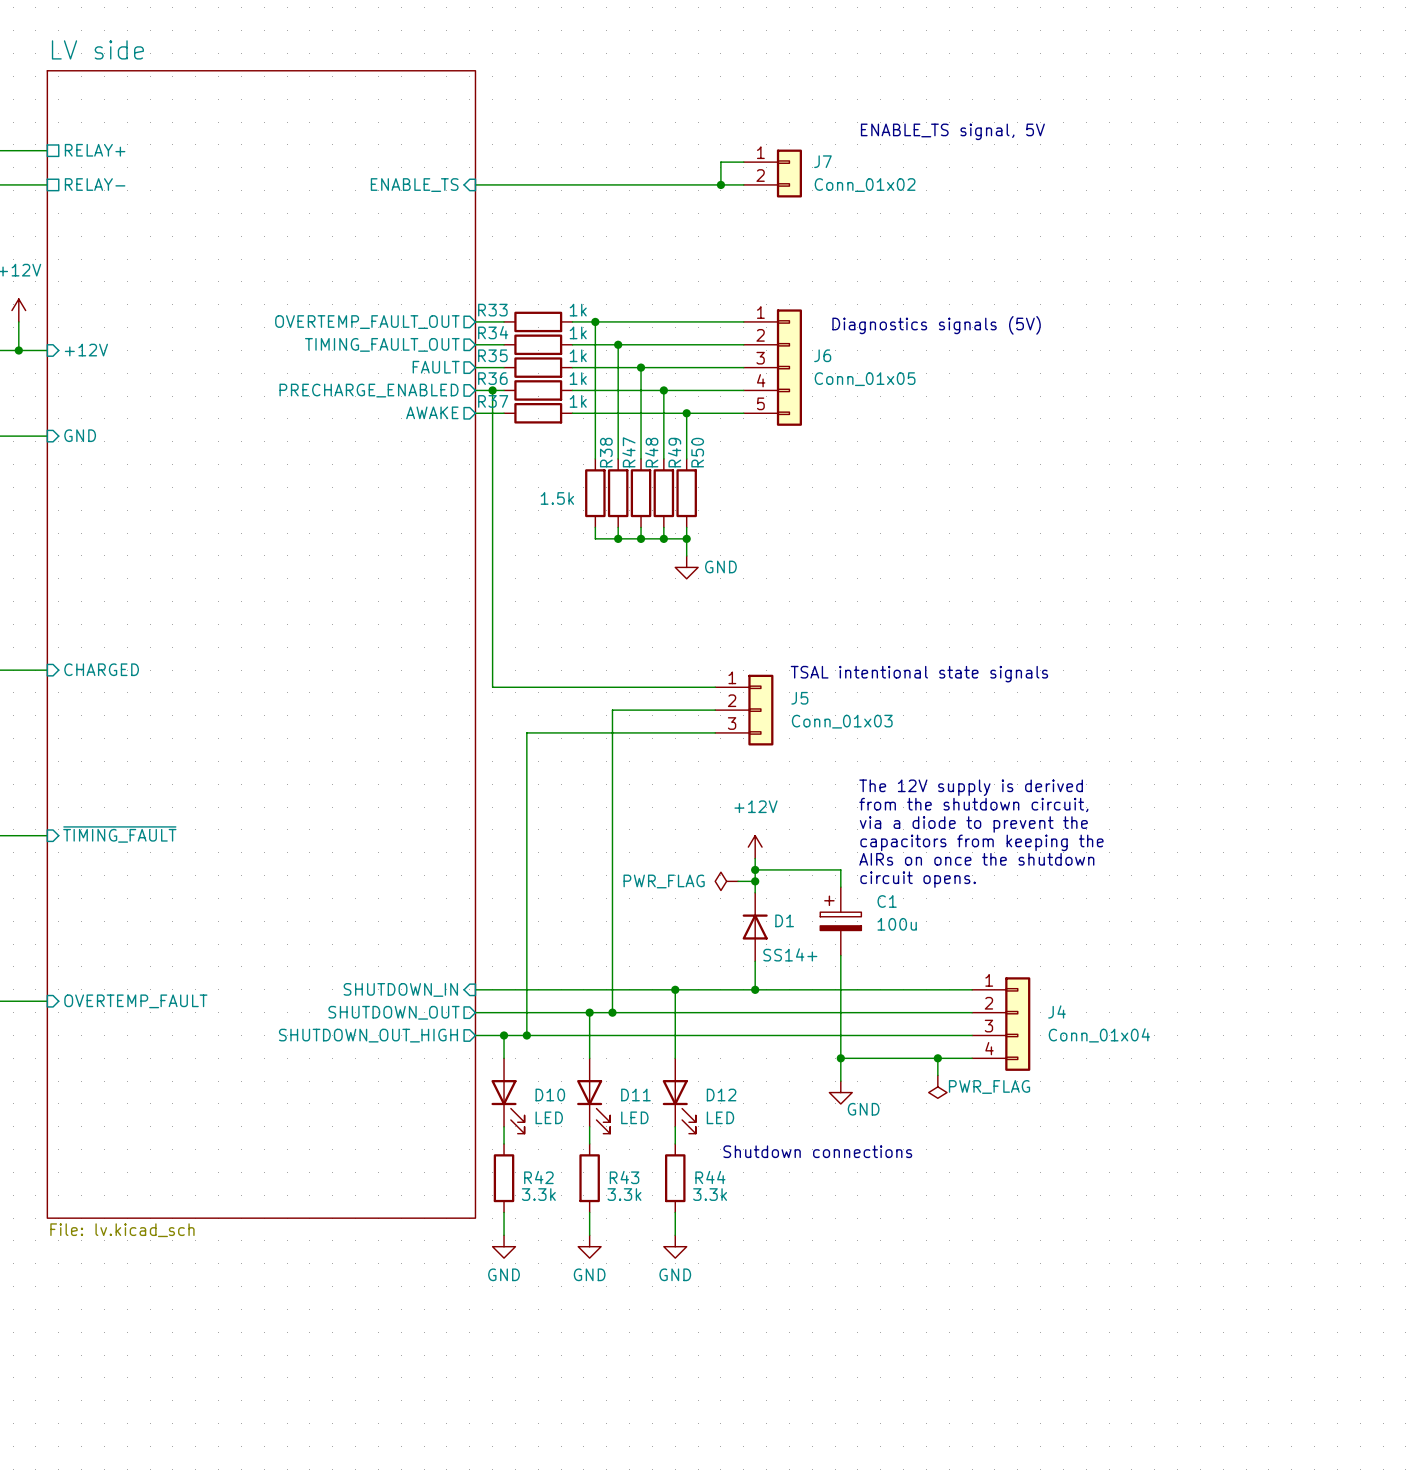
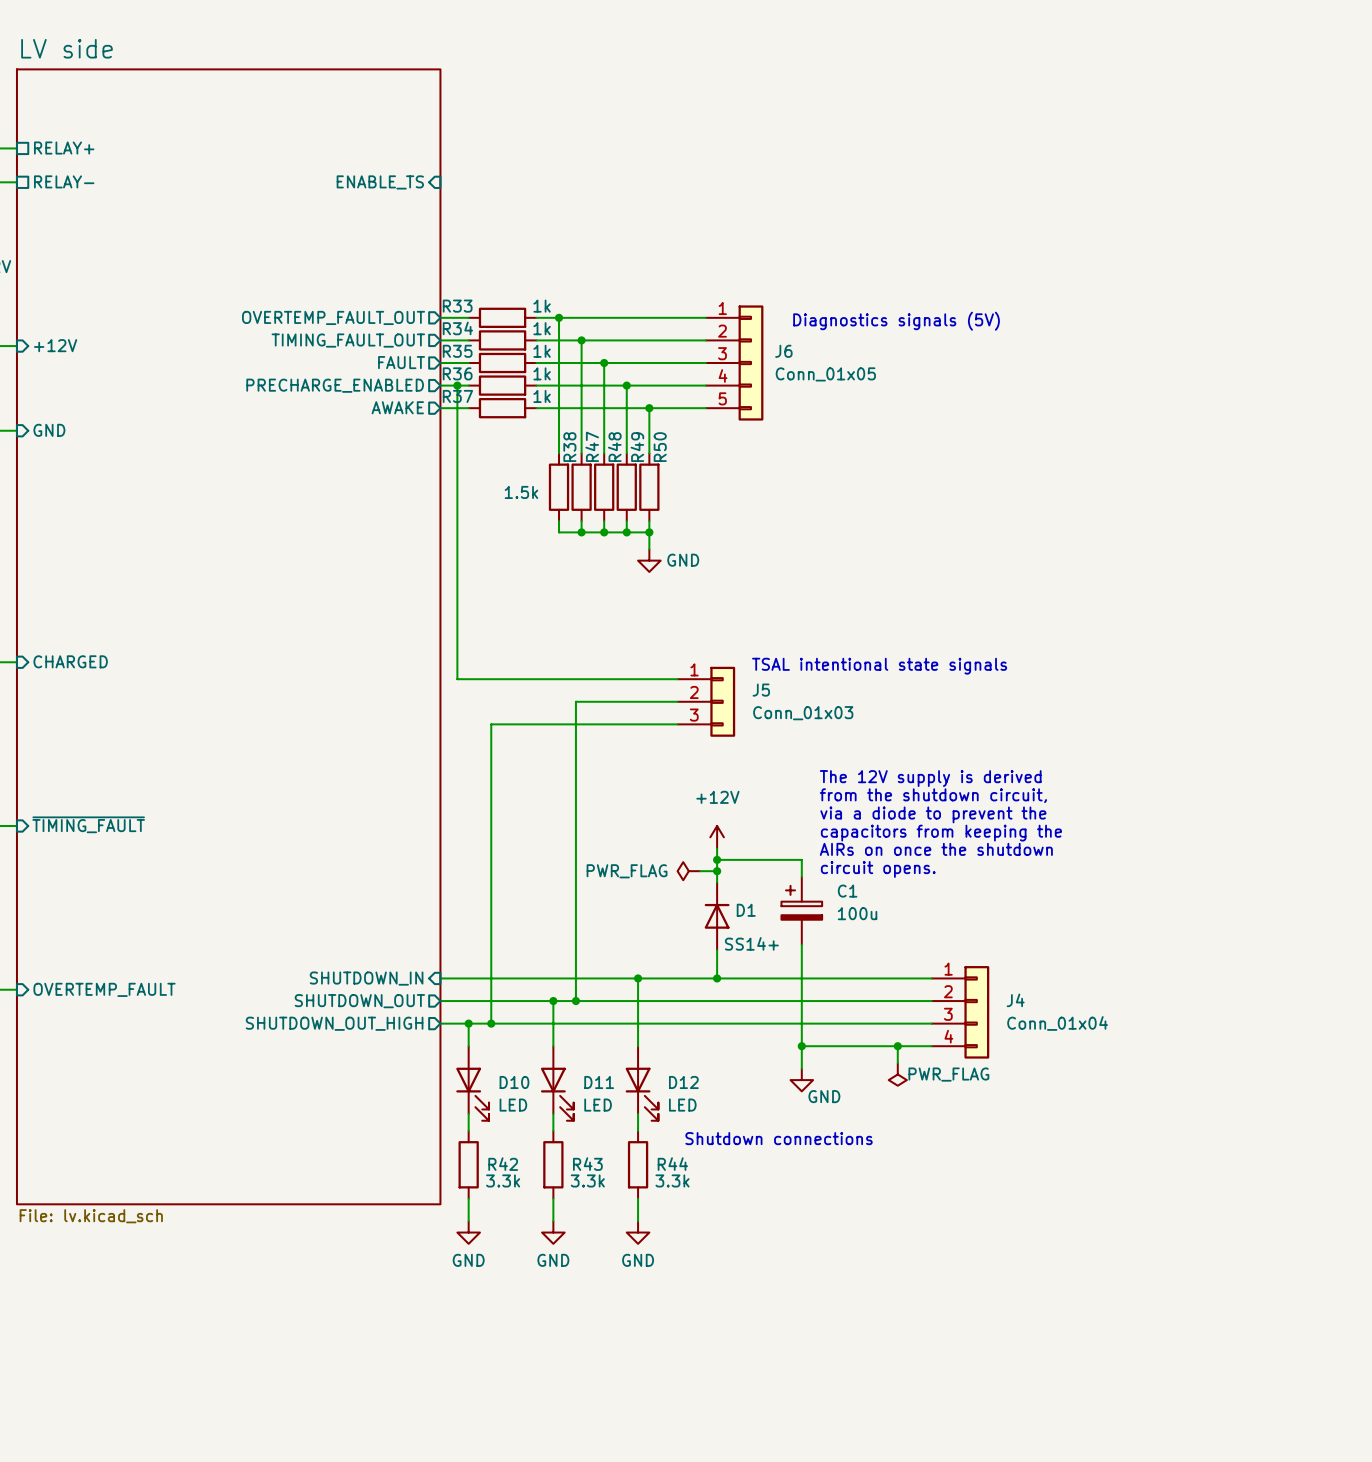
text: ENABLE_TS signal, 5V (952, 131) -> none
wire: (743, 162) (720, 162) (720, 184) -> none
J7: Conn_01x02 (772, 173) -> none
wire: (475, 184) (743, 184) -> none
junction: (720, 184) -> none

